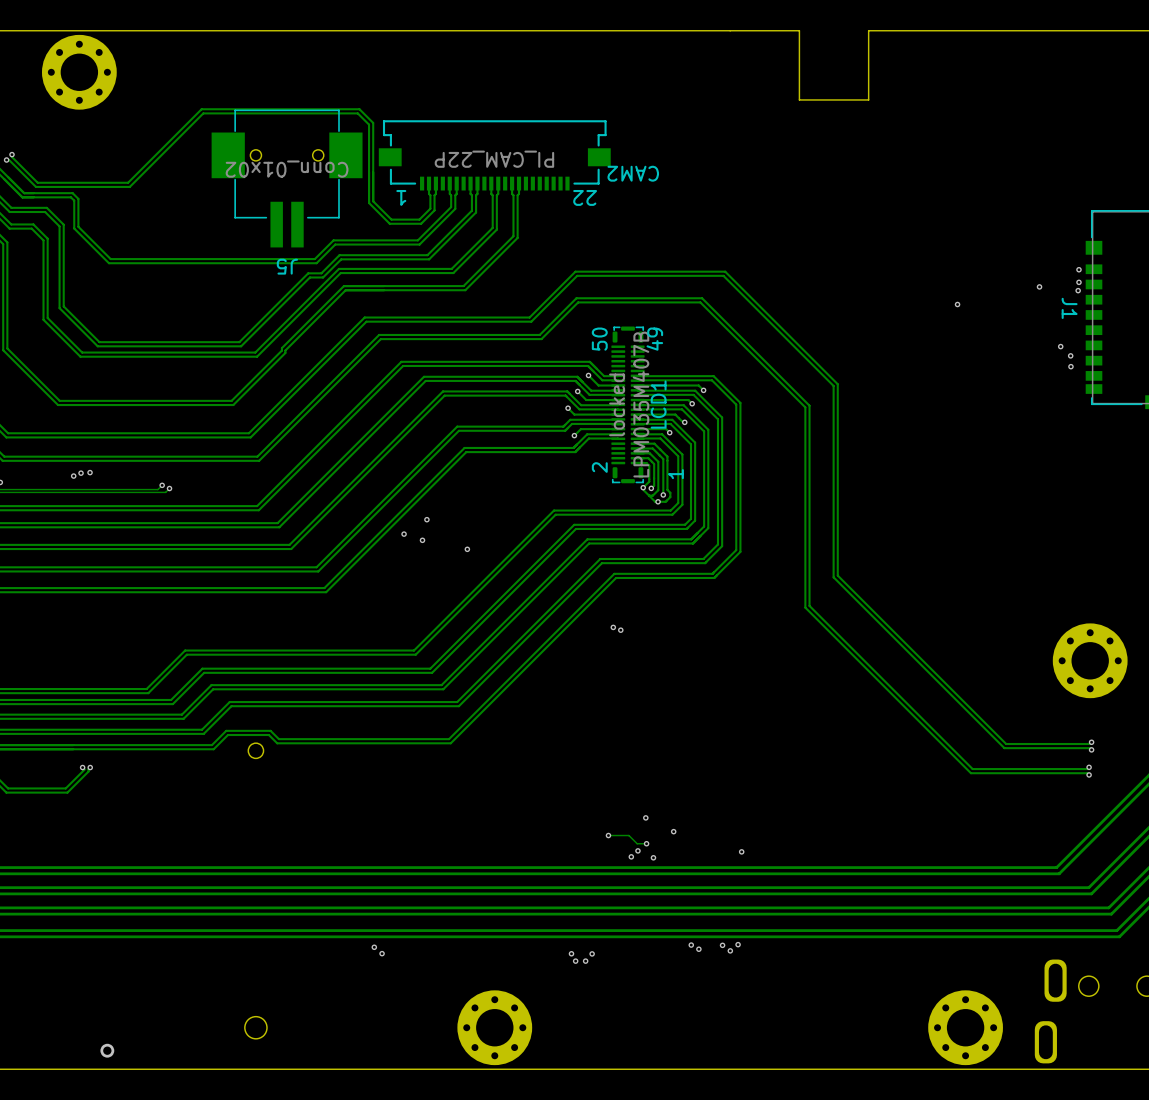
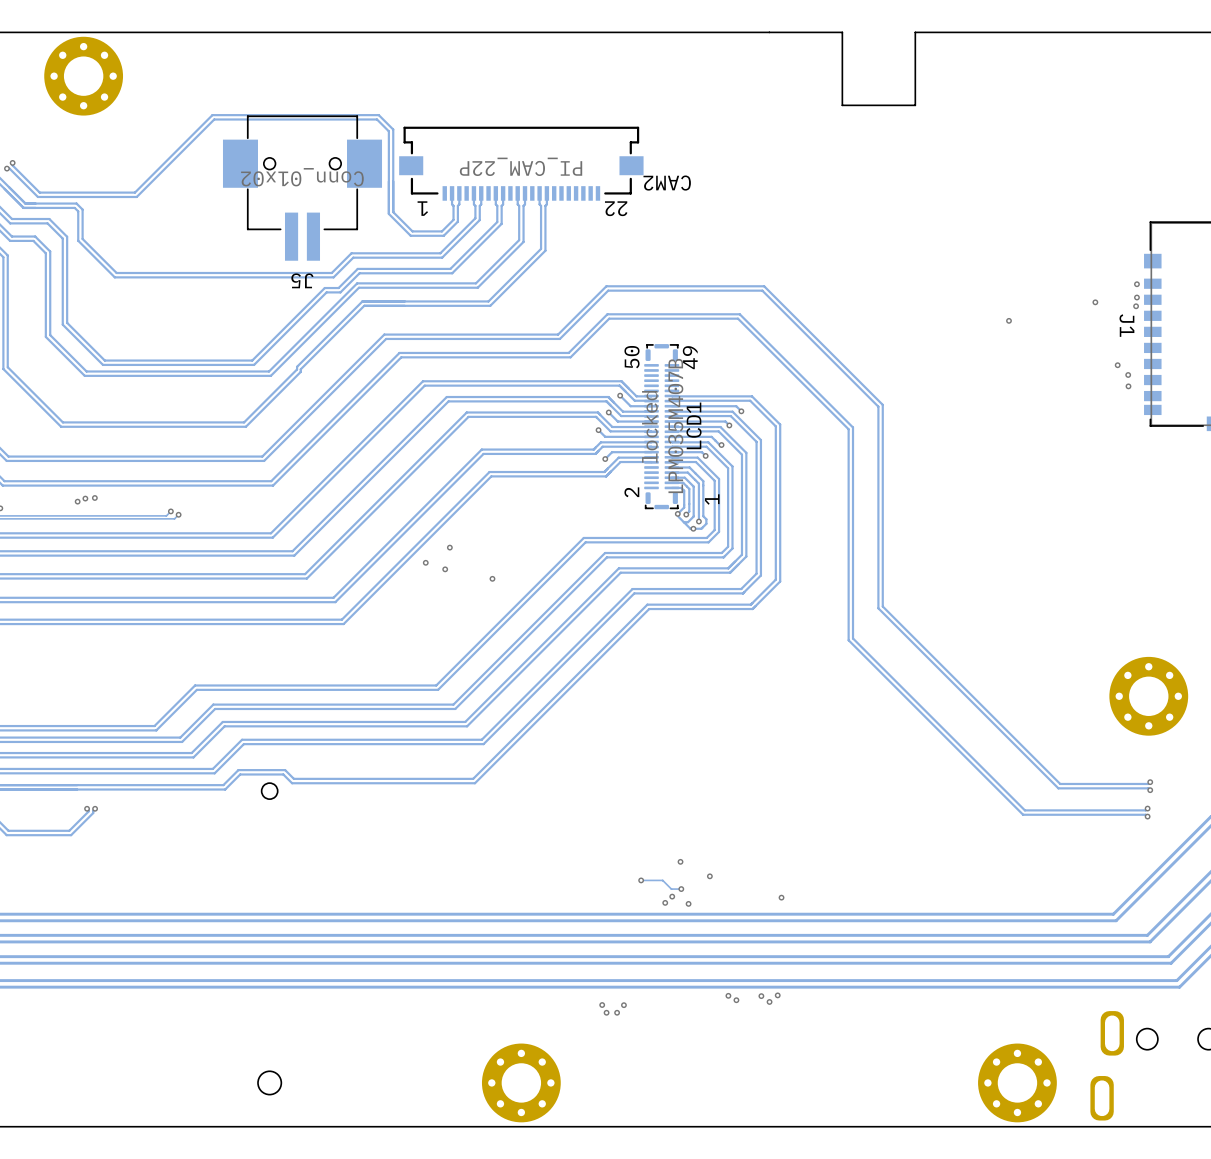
via: (613, 627) -> none
via: (620, 630) -> none
via: (374, 947) -> none
via: (382, 953) -> none
via: (107, 1050) -> none

